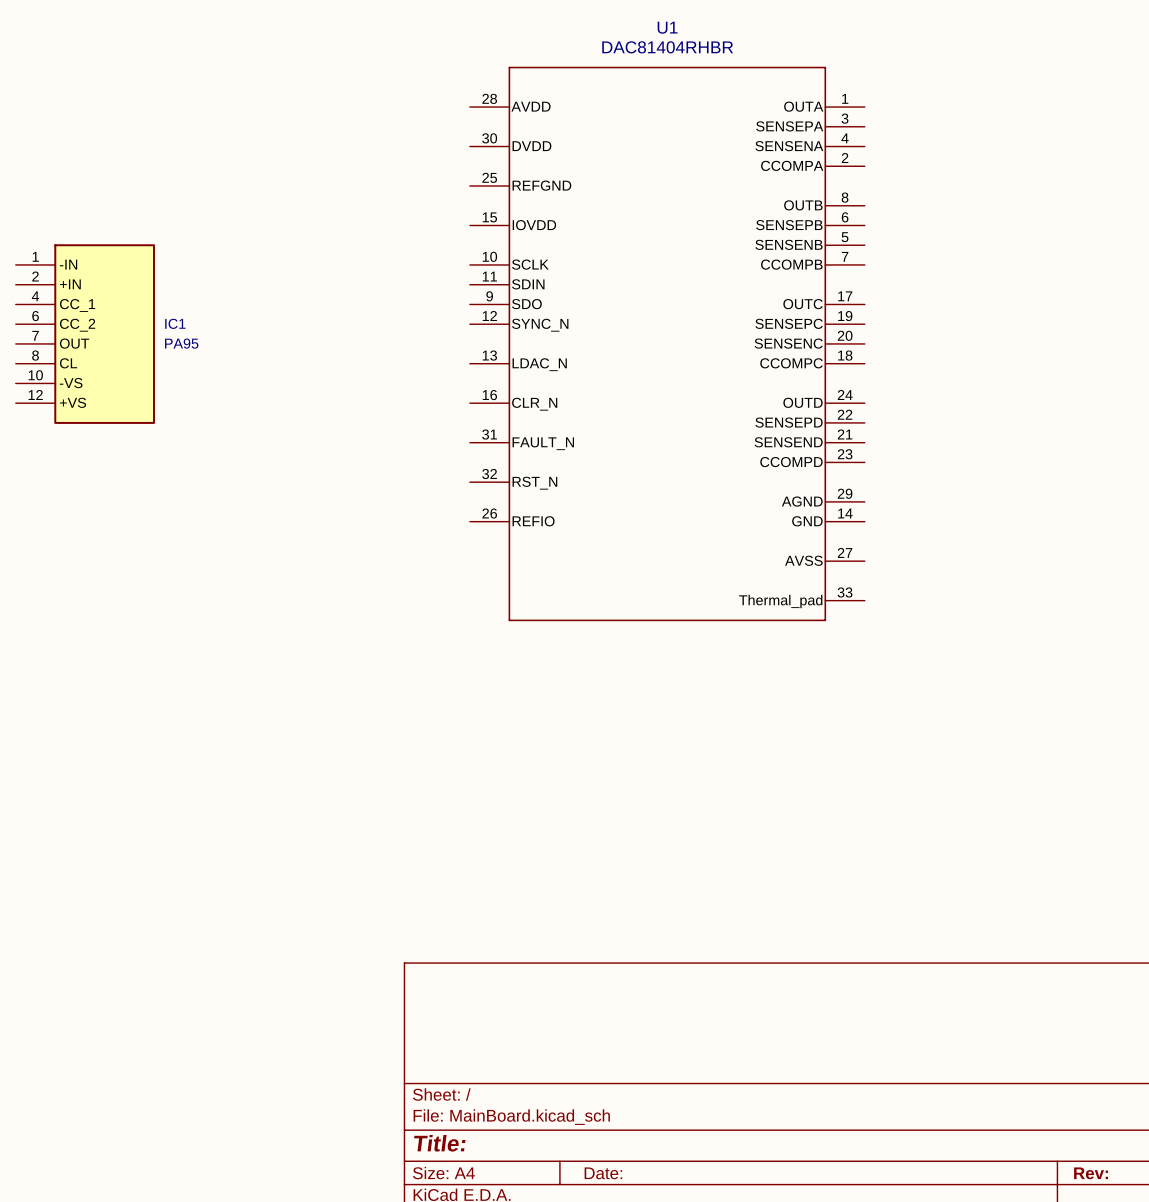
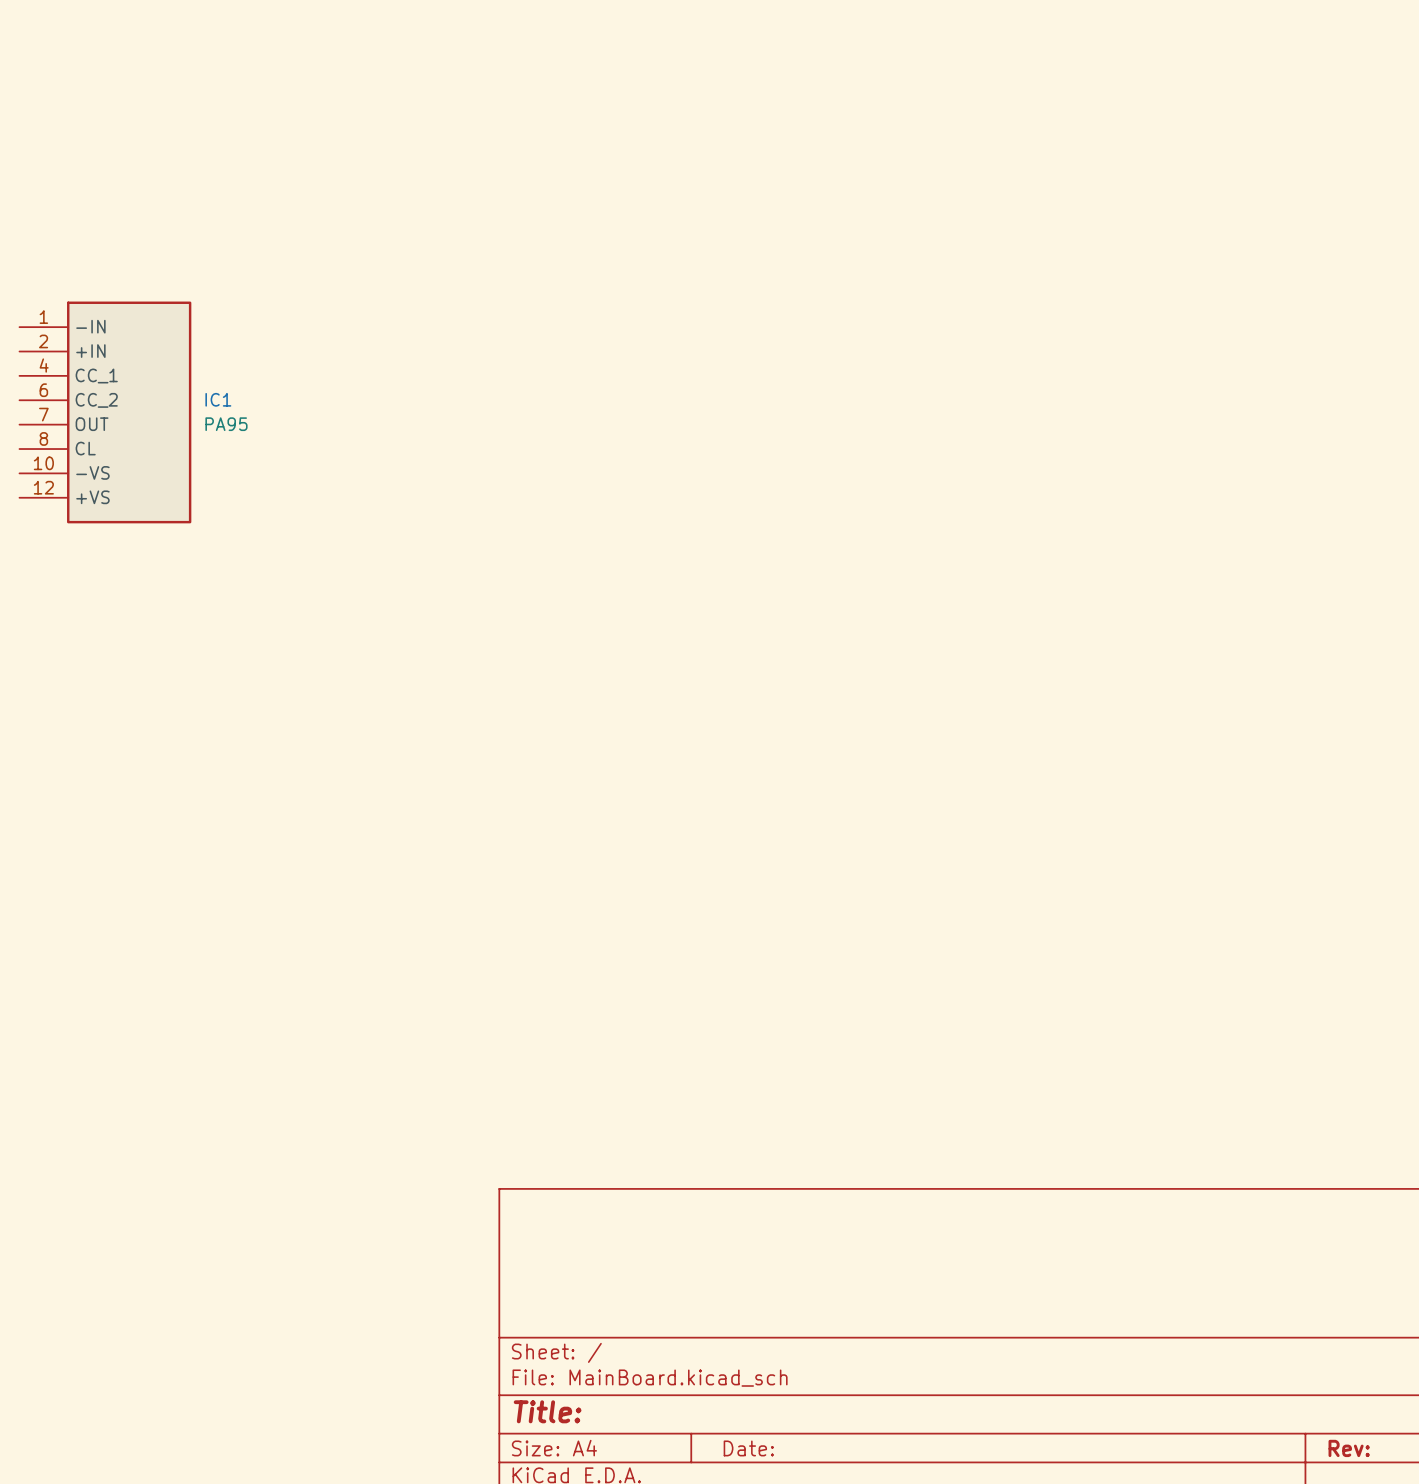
U1: DAC81404RHBR (667, 343) -> none

